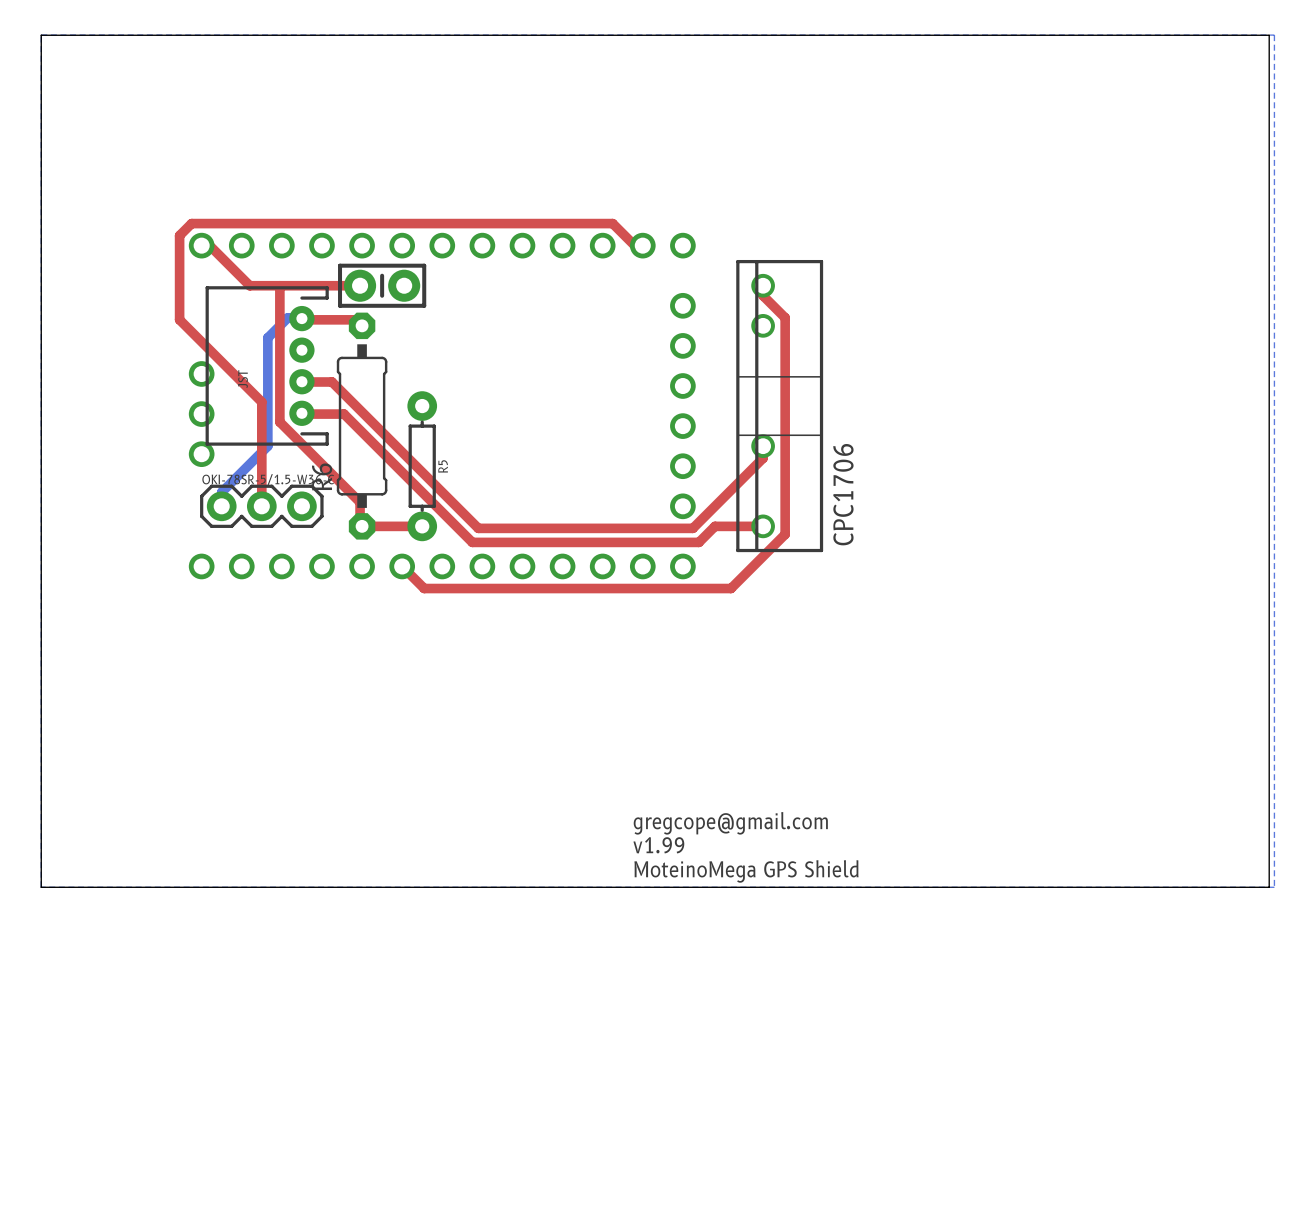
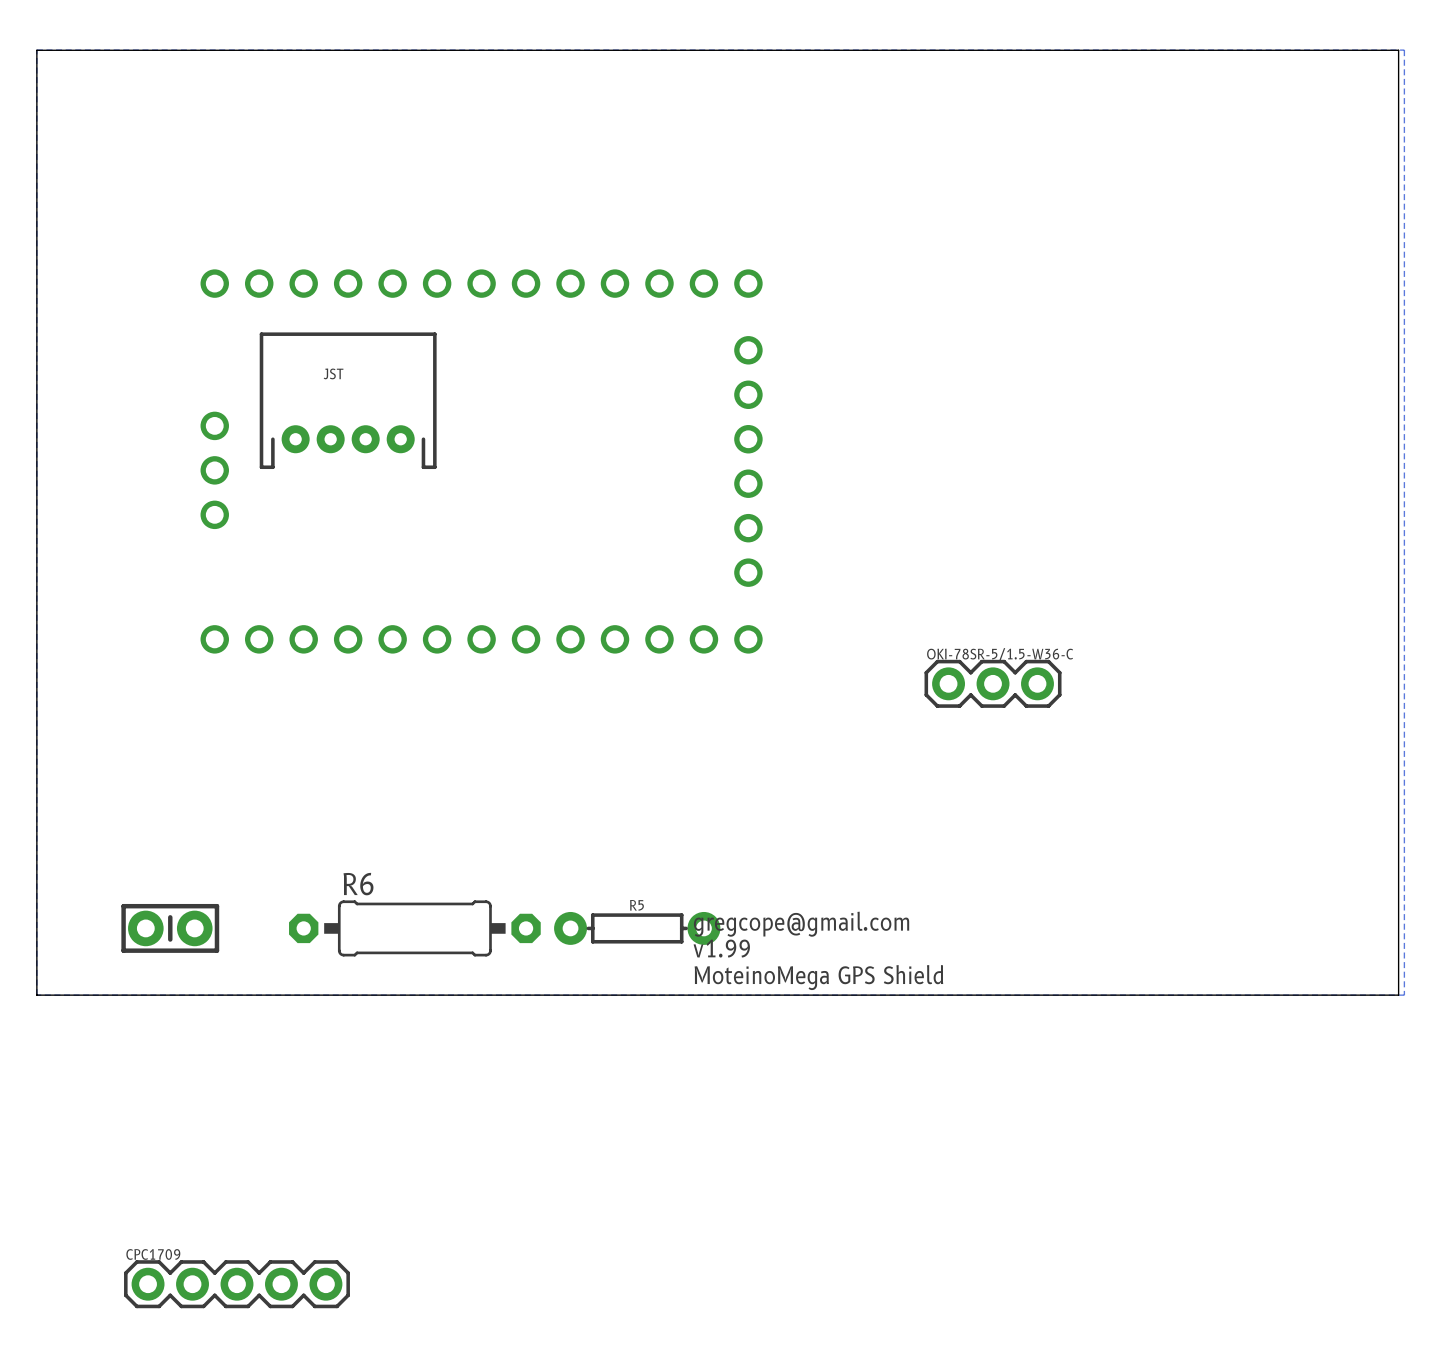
top track: (201, 245) (209, 245) (249, 285) (360, 285) -> none
top track: (642, 245) (634, 245) (612, 223) (191, 223) (179, 235) (179, 319) (261, 402) (261, 506) -> none
top track: (279, 285) (279, 422) (360, 502) (360, 522) (362, 526) (422, 526) -> none
part: (382, 285) -> none
top track: (763, 285) (763, 295) (785, 317) (785, 534) (731, 588) (424, 588) (402, 566) -> none
top track: (301, 318) (356, 319) (362, 325) -> none
bottom track: (301, 318) (287, 317) (267, 337) (267, 446) (221, 492) (221, 506) -> none
JST rotation: 0° (267, 365) -> 90° clockwise (348, 400)
top track: (301, 381) (331, 381) (478, 528) (692, 528) (763, 458) (763, 446) -> none
CPC1706: (779, 406) -> none
top track: (301, 413) (344, 414) (472, 542) (698, 542) (714, 526) (763, 526) -> none
R6 rotation: 0° (362, 426) -> 90° clockwise (414, 928)
R6 position: (362, 426) -> (414, 928)
R5 rotation: 0° (422, 466) -> 90° clockwise (637, 928)
R5 position: (422, 466) -> (637, 928)
OKI-78SR-5/1.5-W36-C position: (261, 506) -> (993, 683)
part: none -> (170, 928)
CPC1709: none -> (236, 1284)

